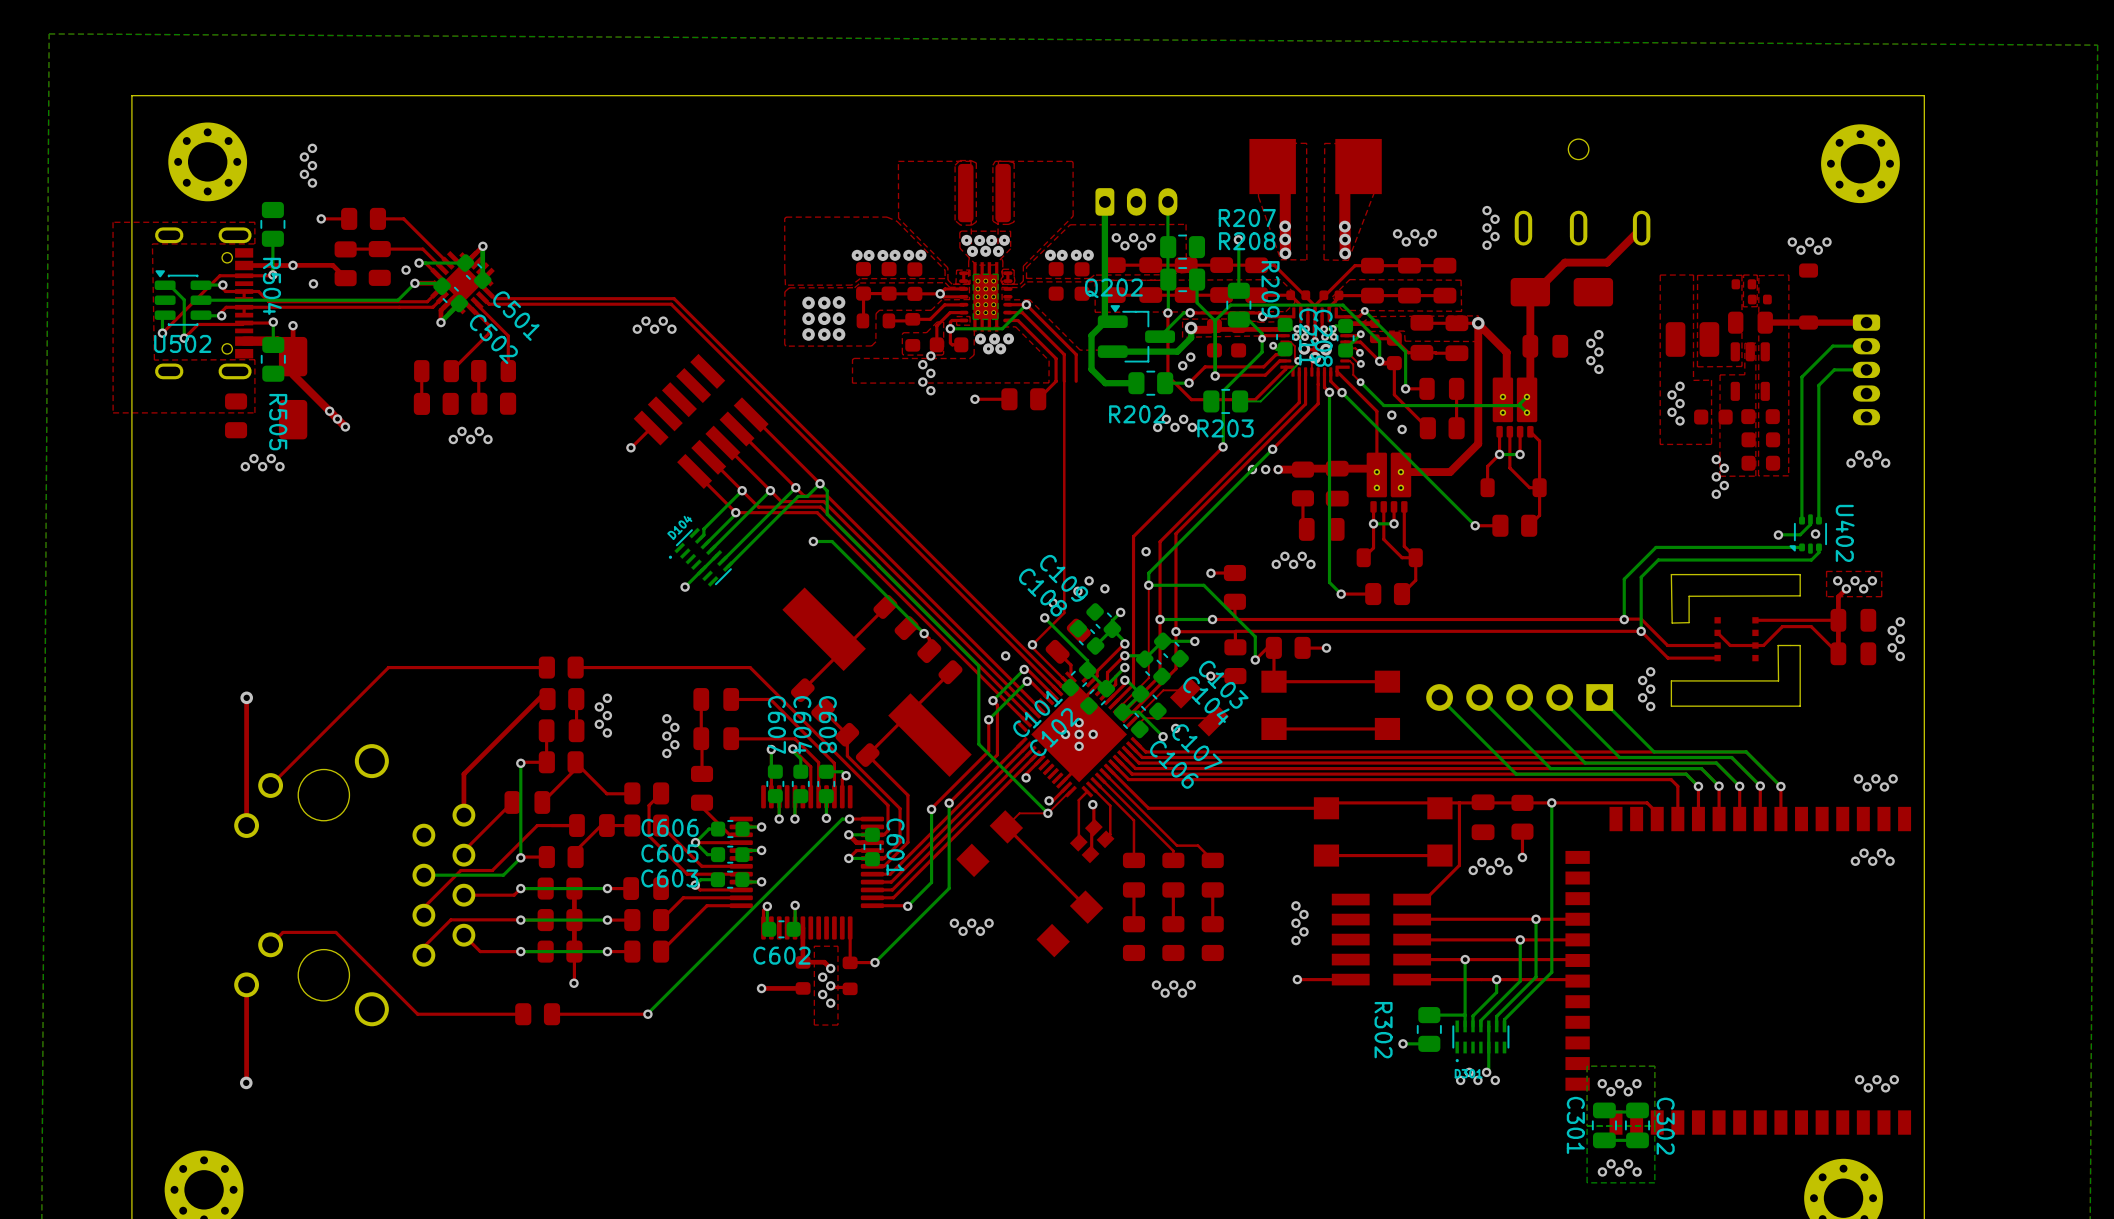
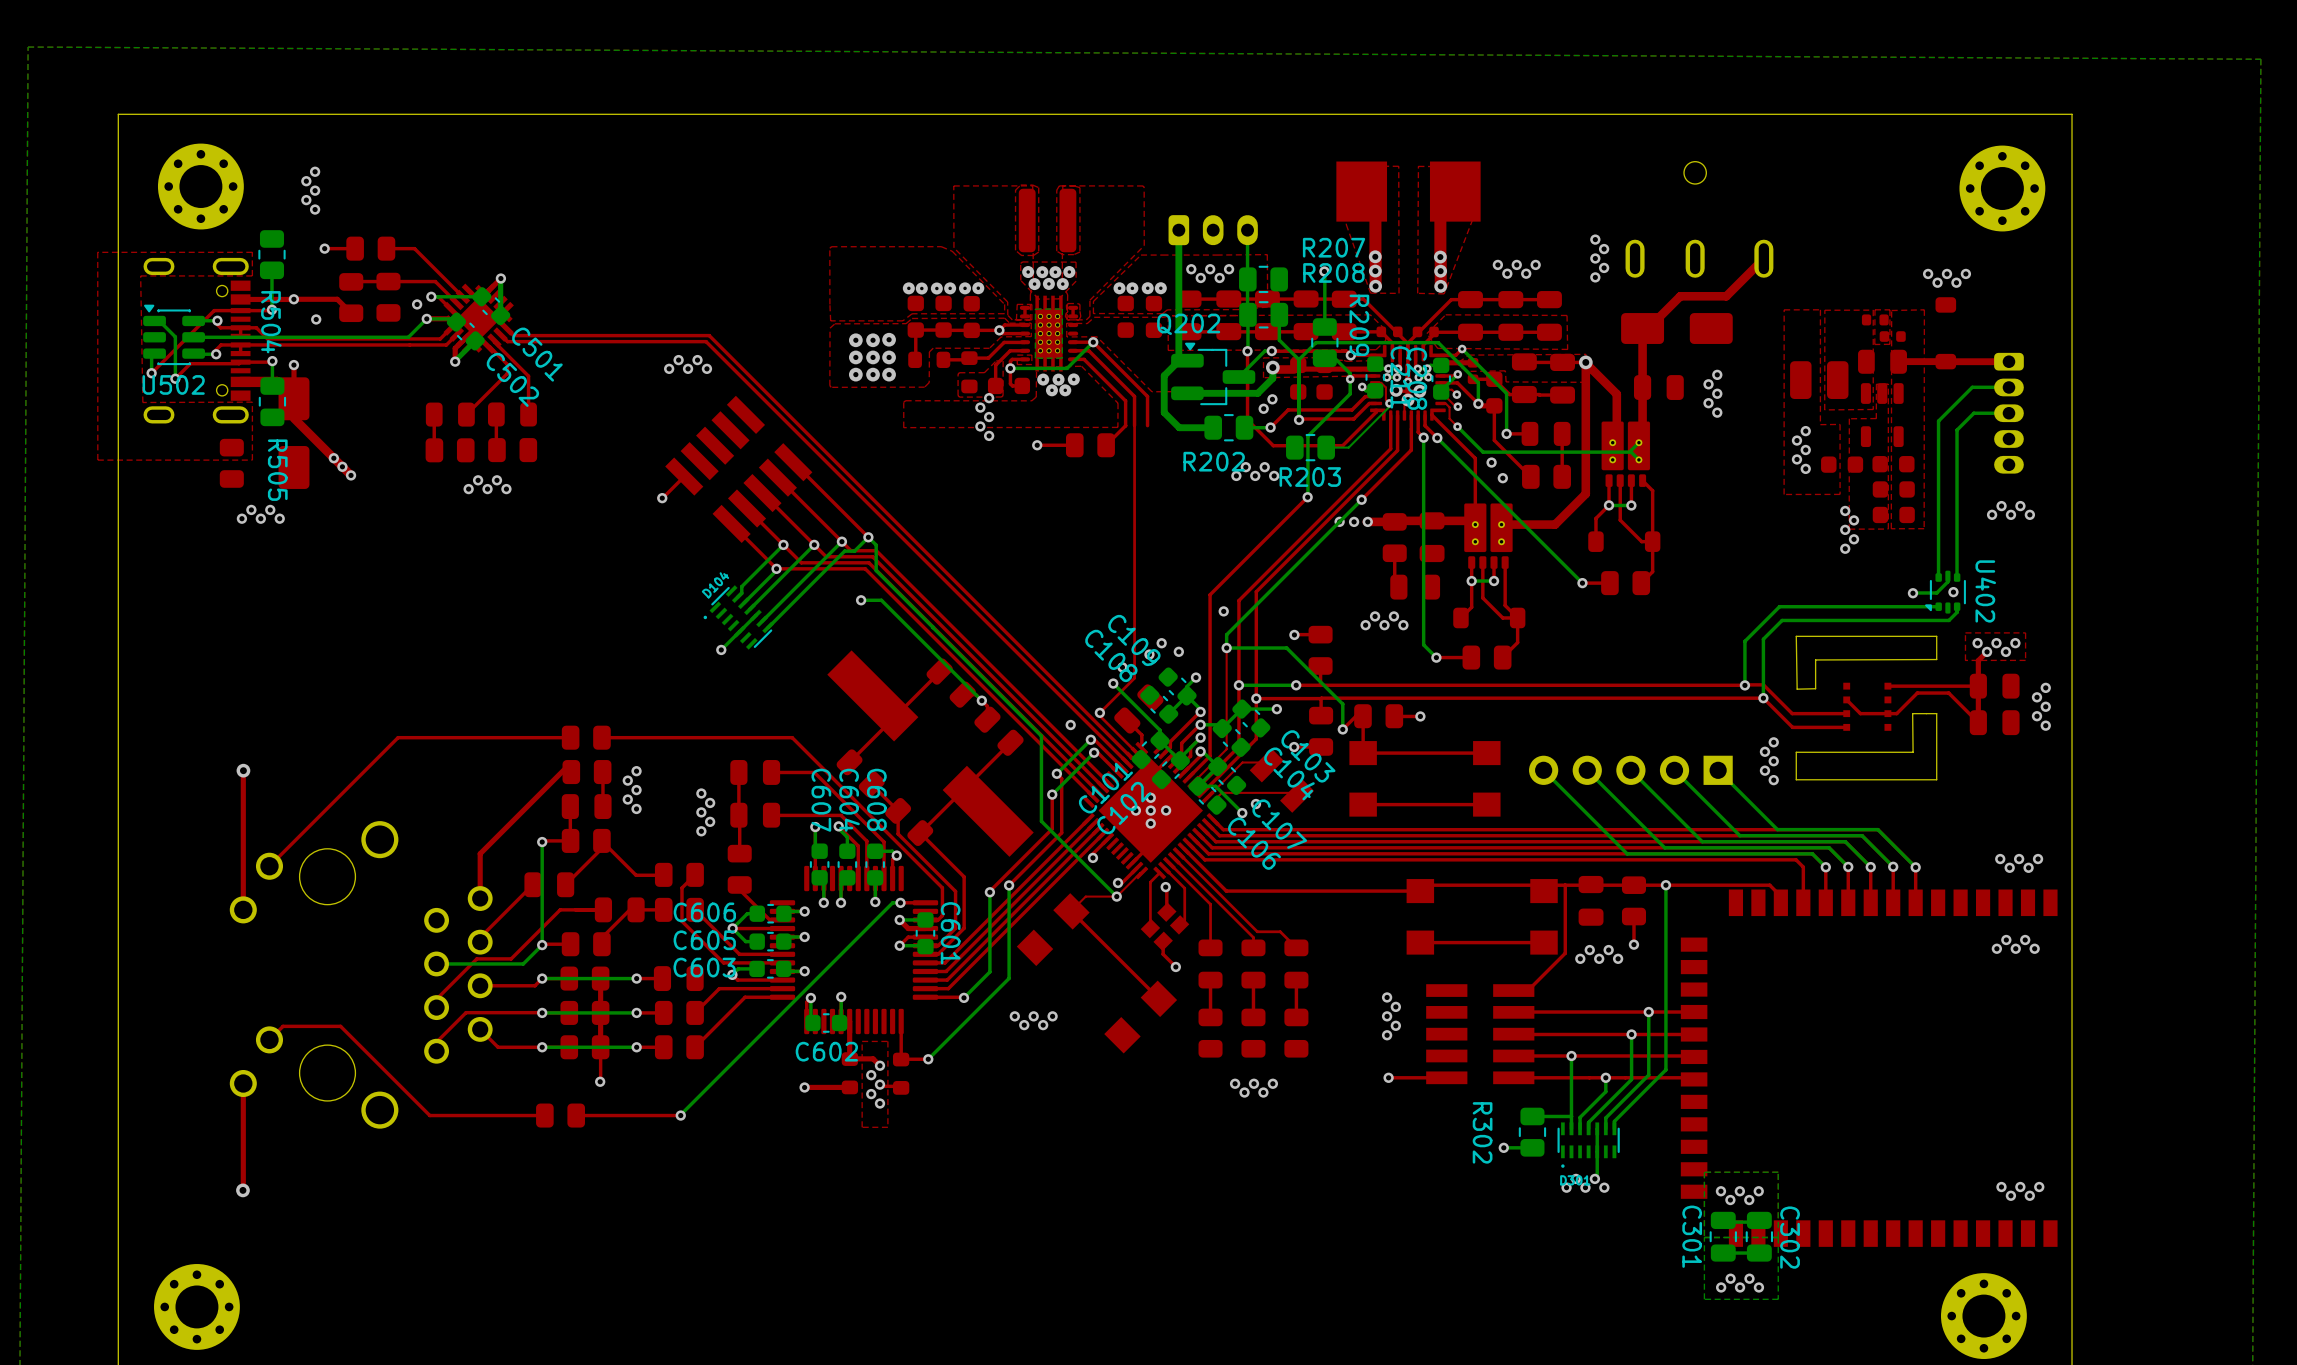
top track: (1091, 829) (1091, 853) -> none
top track: none -> (1163, 941) (1163, 954) (1175, 966)
via: none -> (1175, 966)

